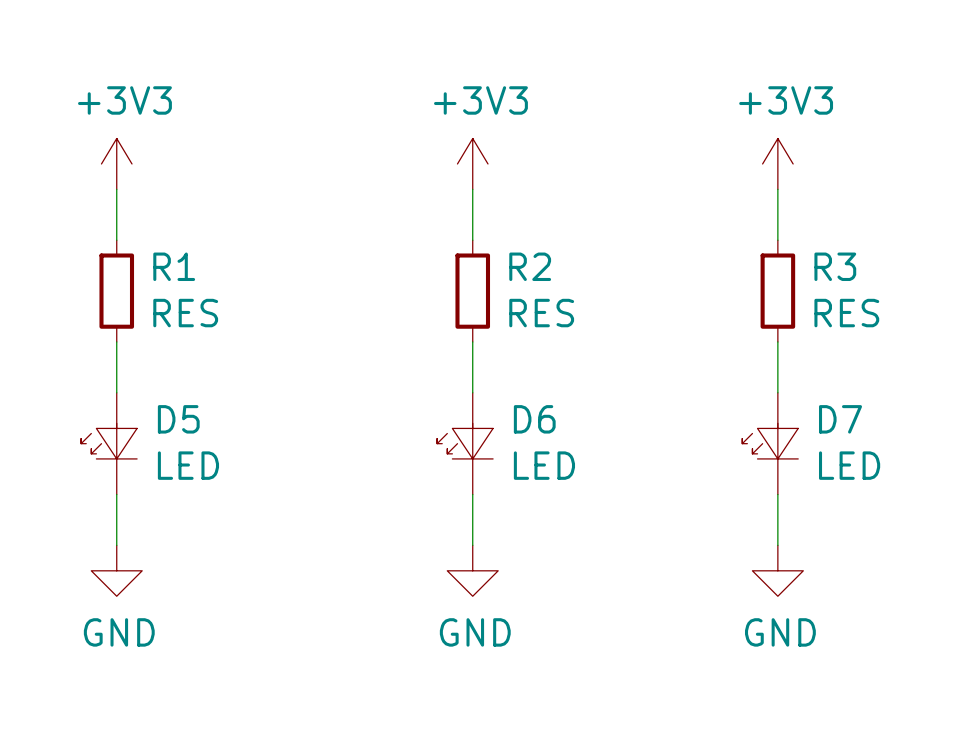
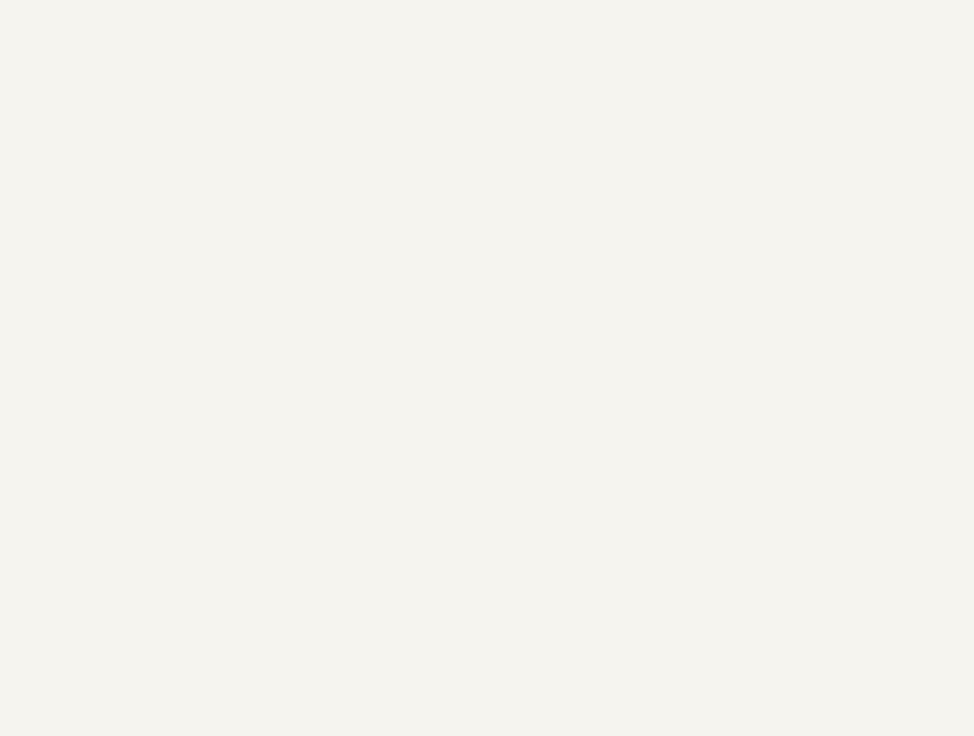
power symbol: +3V3 (116, 163) -> none
power symbol: +3V3 (472, 163) -> none
power symbol: +3V3 (777, 163) -> none
wire: (116, 189) (116, 240) -> none
wire: (472, 189) (472, 240) -> none
wire: (777, 189) (777, 240) -> none
R1: RES (116, 291) -> none
R2: RES (472, 291) -> none
R3: RES (777, 291) -> none
wire: (116, 341) (116, 392) -> none
wire: (472, 341) (472, 392) -> none
wire: (777, 341) (777, 392) -> none
D5: LED (109, 443) -> none
D6: LED (465, 443) -> none
D7: LED (770, 443) -> none
wire: (116, 494) (116, 545) -> none
wire: (472, 494) (472, 545) -> none
wire: (777, 494) (777, 545) -> none
power symbol: GND (116, 570) -> none
power symbol: GND (472, 570) -> none
power symbol: GND (777, 570) -> none

